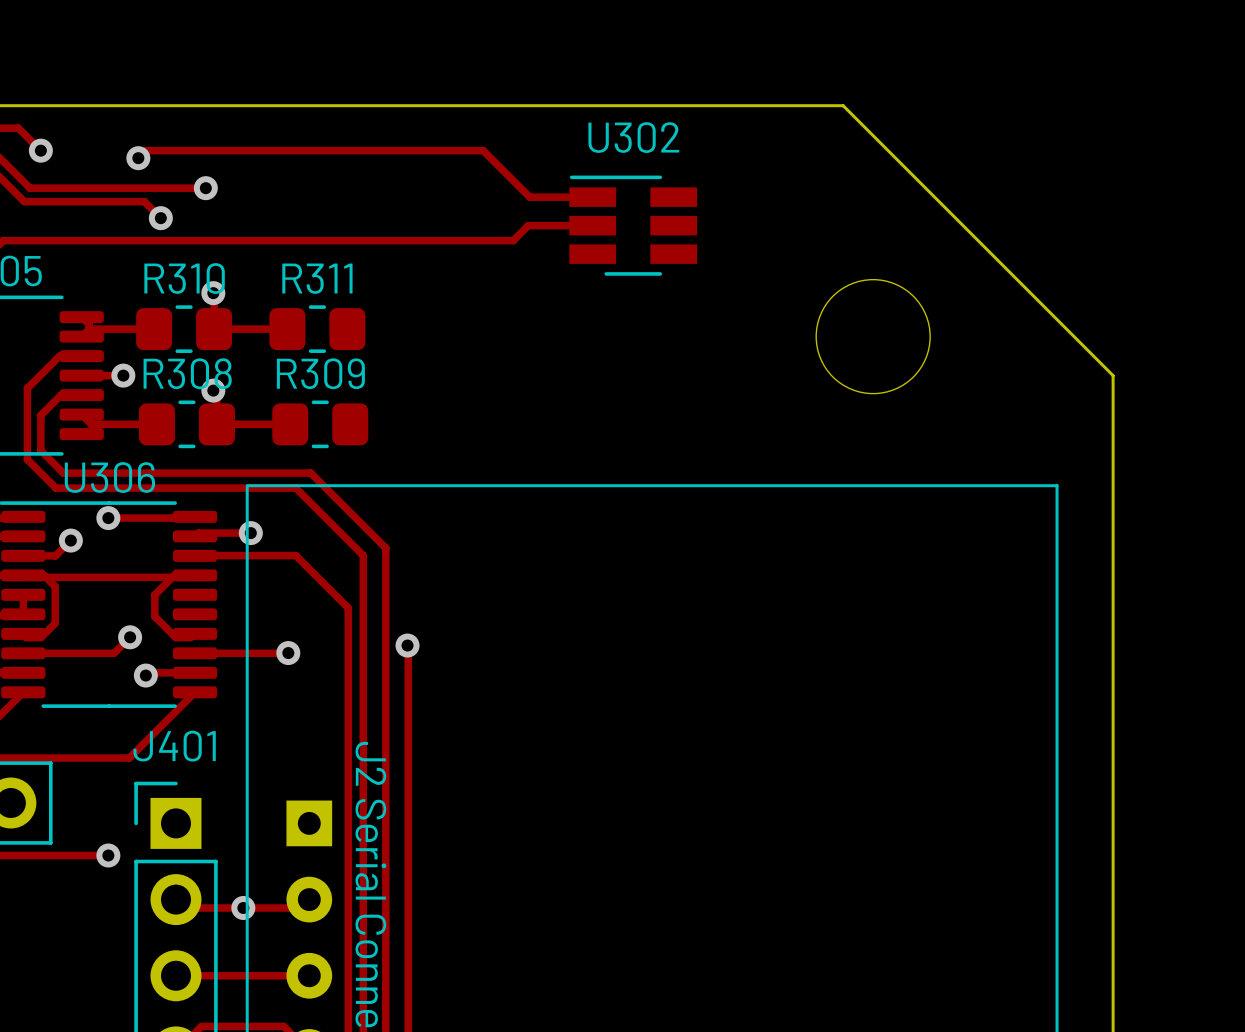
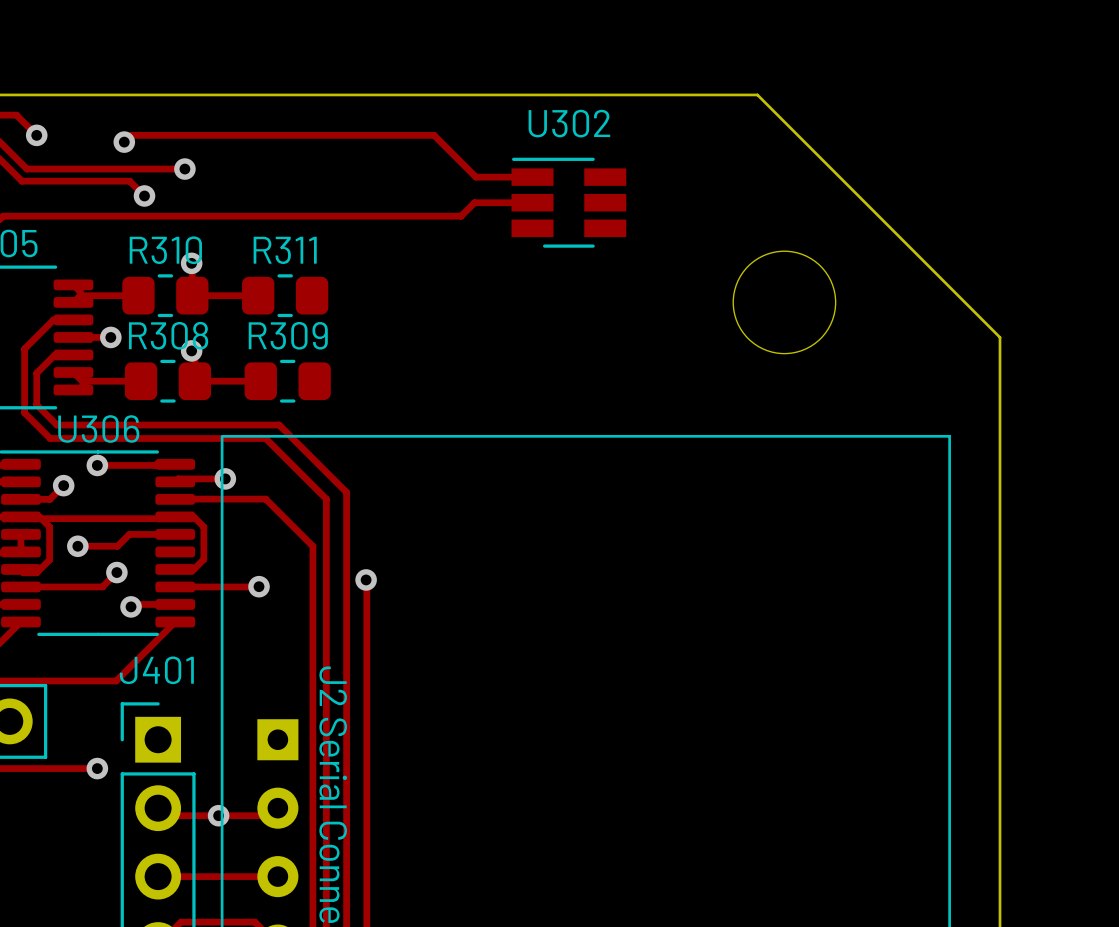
track: (195, 575) (174, 575) (154, 594) (154, 616) (175, 637) (190, 637) -> (175, 516) (193, 516) (203, 526) (203, 559) (193, 569) (175, 569)
track: none -> (175, 534) (129, 534) (117, 546) (77, 546)
via: none -> (77, 546)

